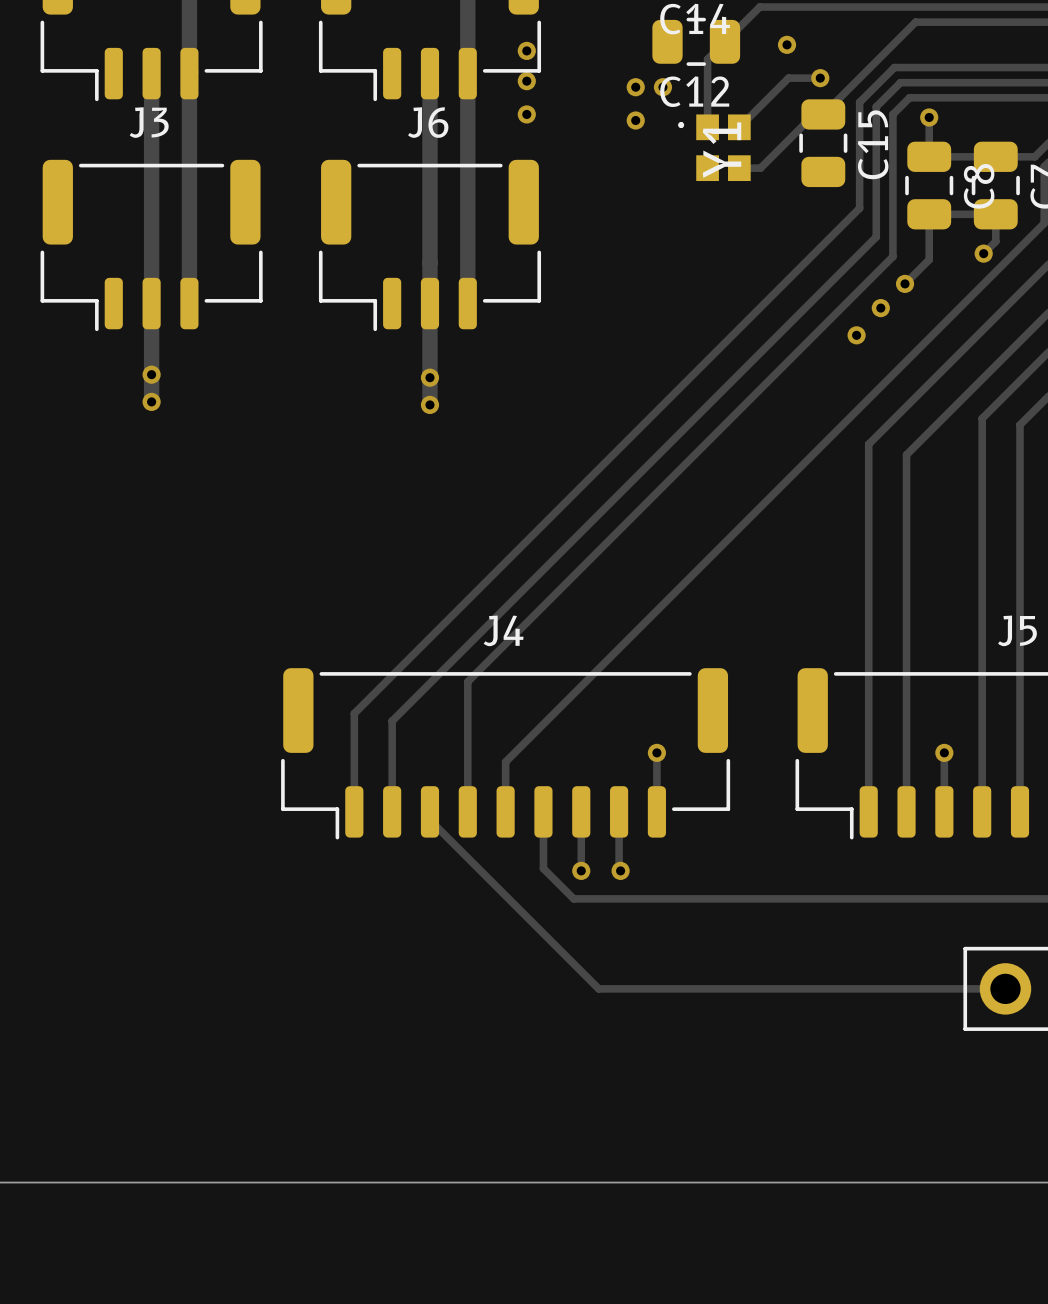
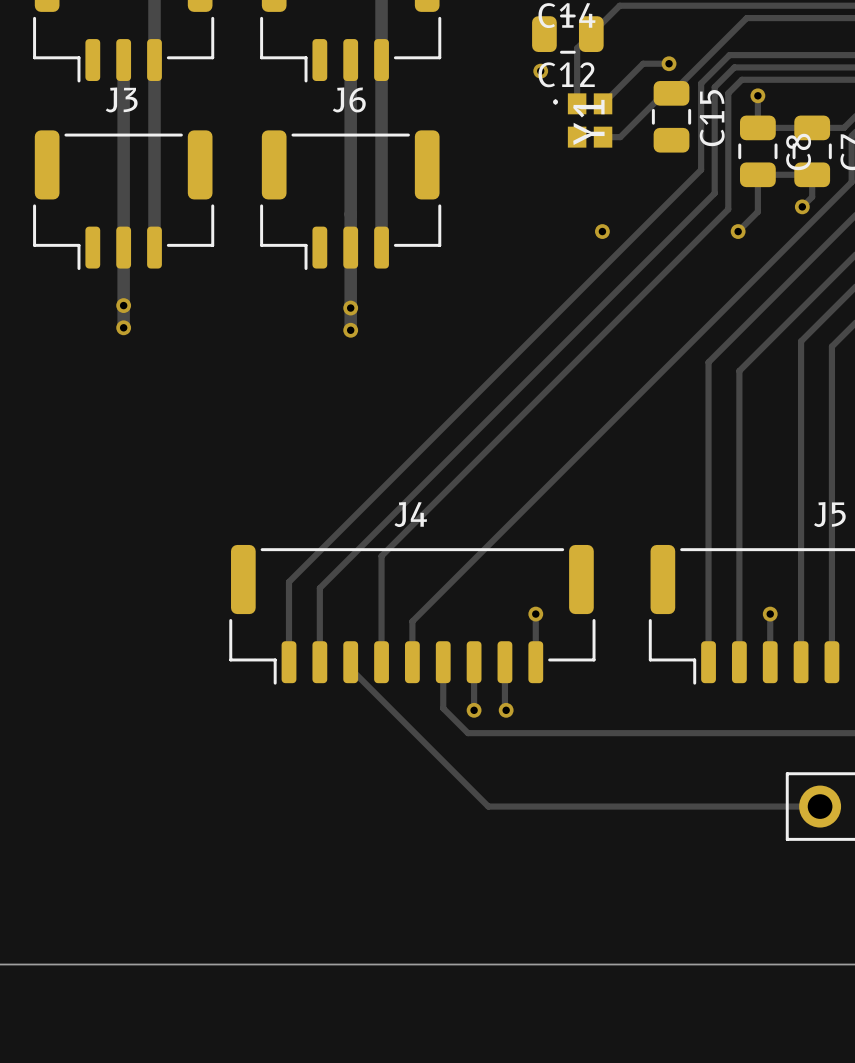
via: (787, 44) -> none
via: (526, 50) -> none
via: (526, 81) -> none
via: (635, 87) -> none
via: (526, 114) -> none
via: (635, 120) -> none
via: none -> (602, 231)
via: (880, 308) -> none
via: (856, 335) -> none

